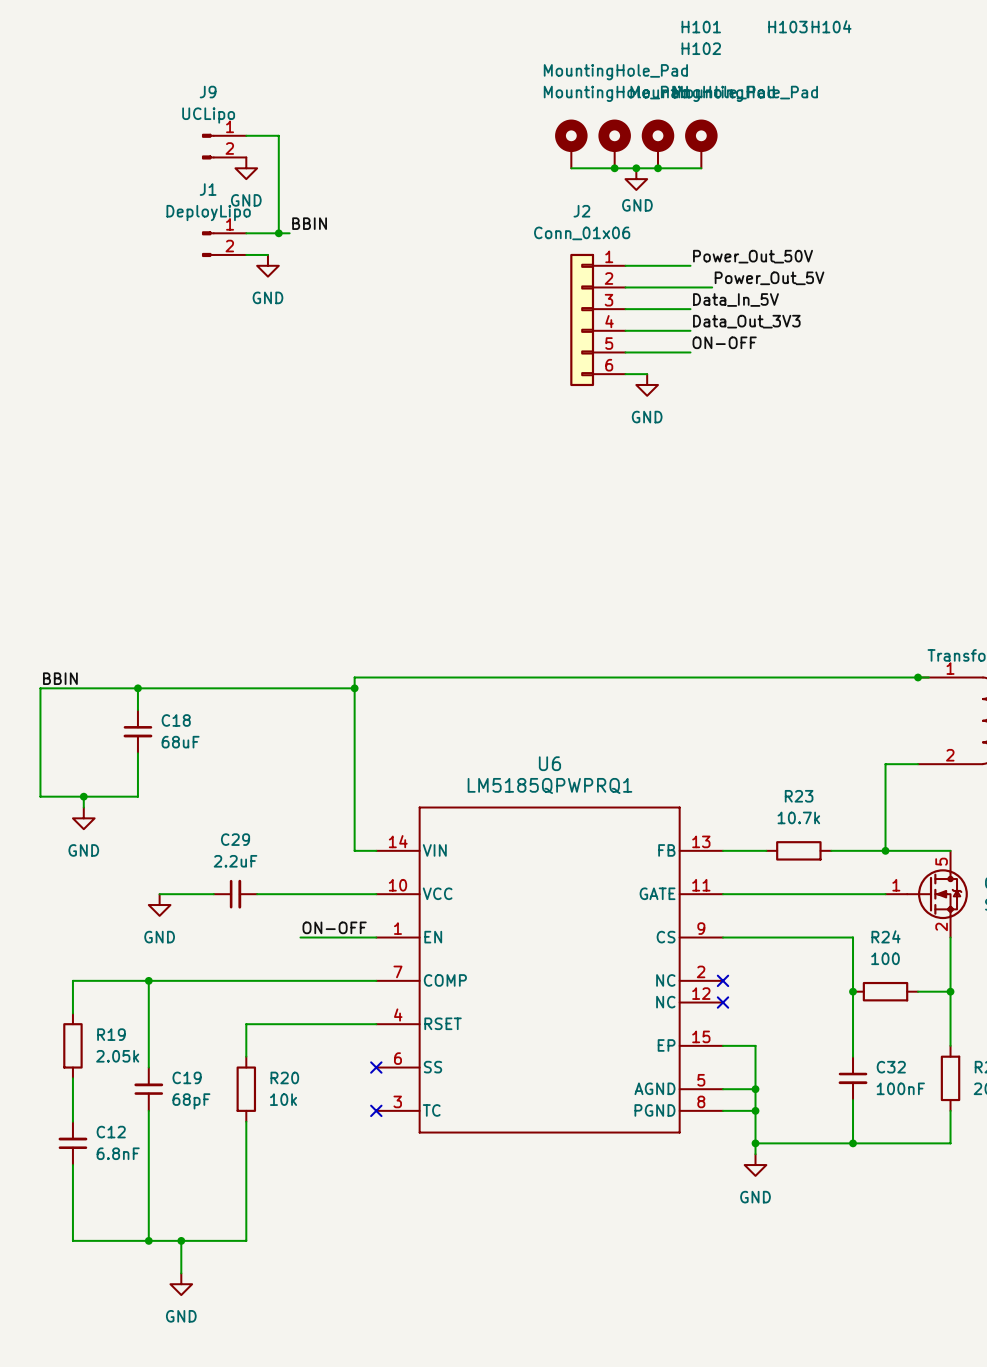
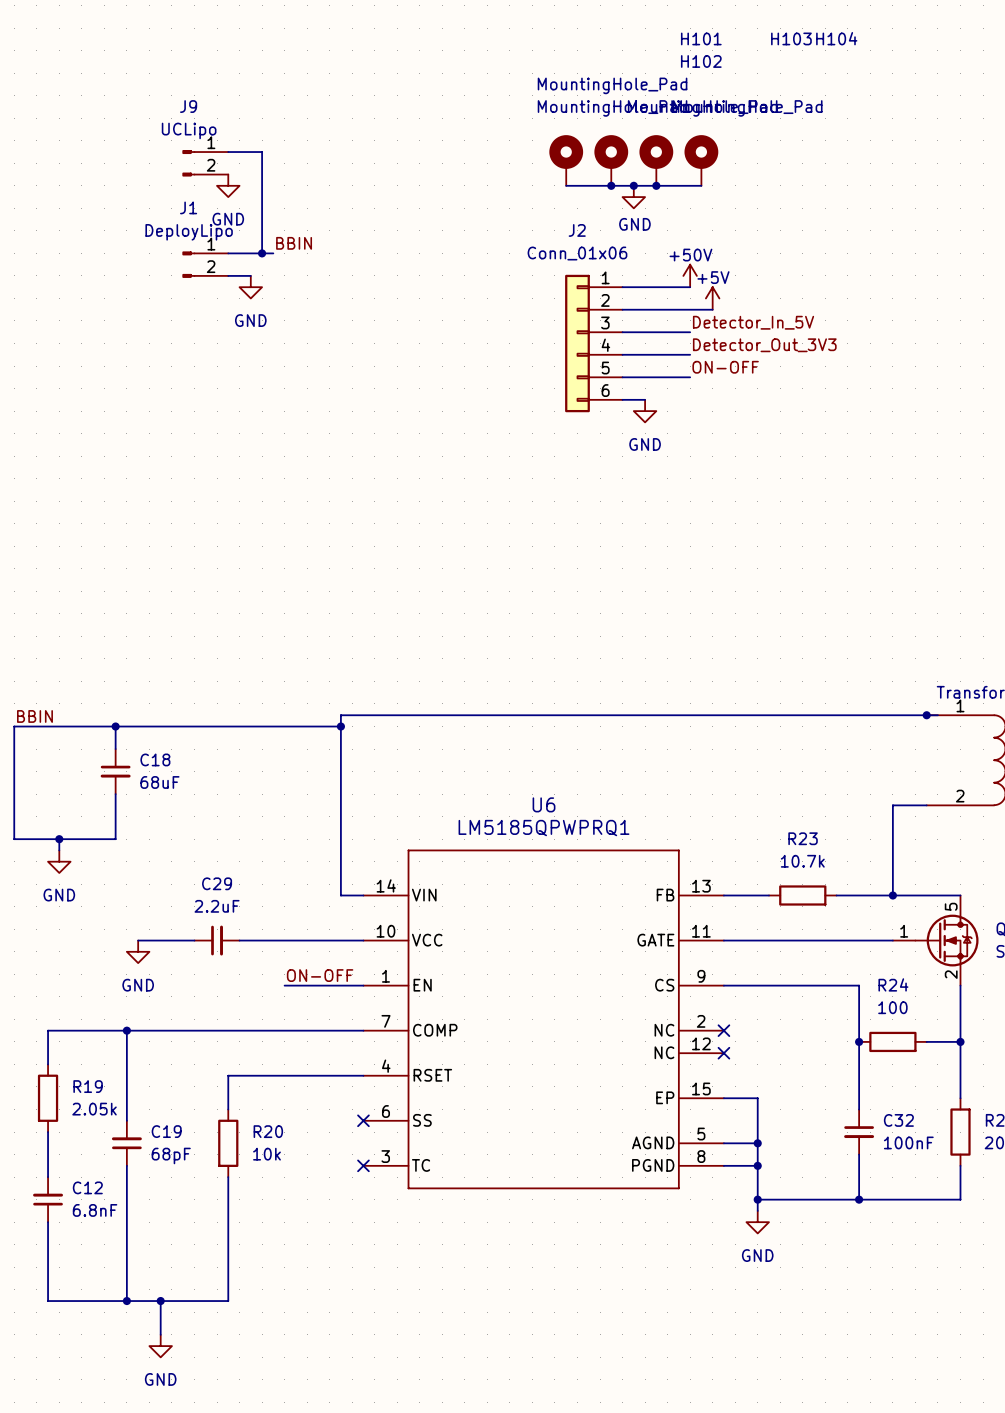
power symbol: none -> +50V (690, 275)
label: Power_Out_50V (753, 256) -> none
power symbol: none -> +5V (712, 298)
label: Power_Out_5V (769, 278) -> none
label: Data_In_5V (735, 299) -> Detector_In_5V (753, 322)
label: Data_Out_3V3 (746, 321) -> Detector_Out_3V3 (764, 345)

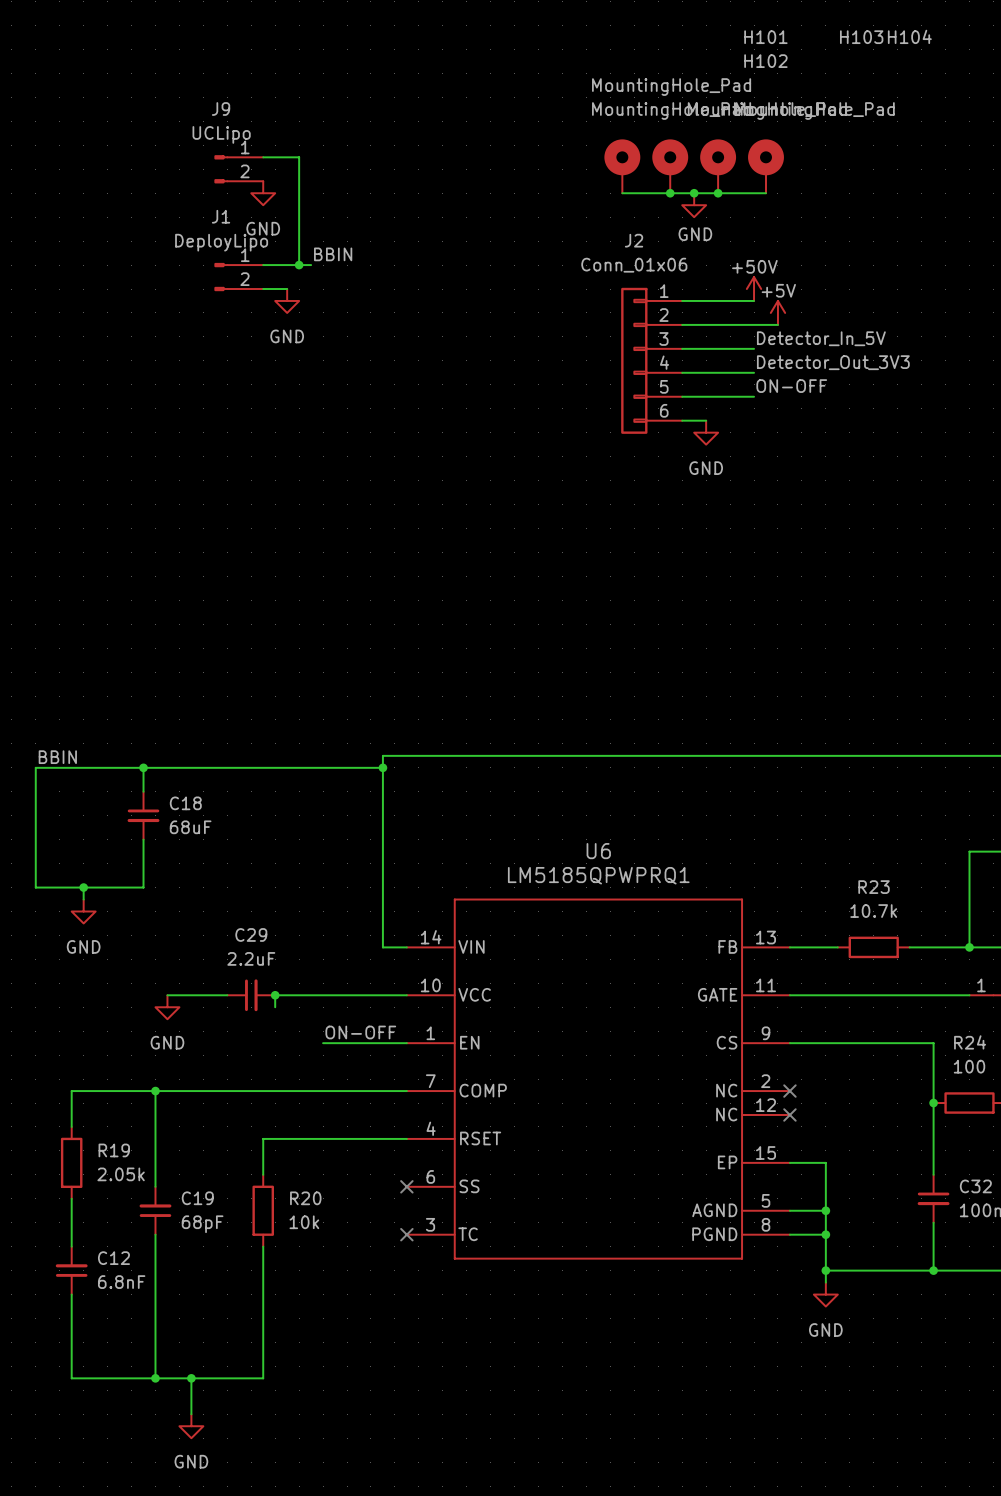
wire: none -> (275, 995) (275, 1007)
junction: none -> (275, 995)

